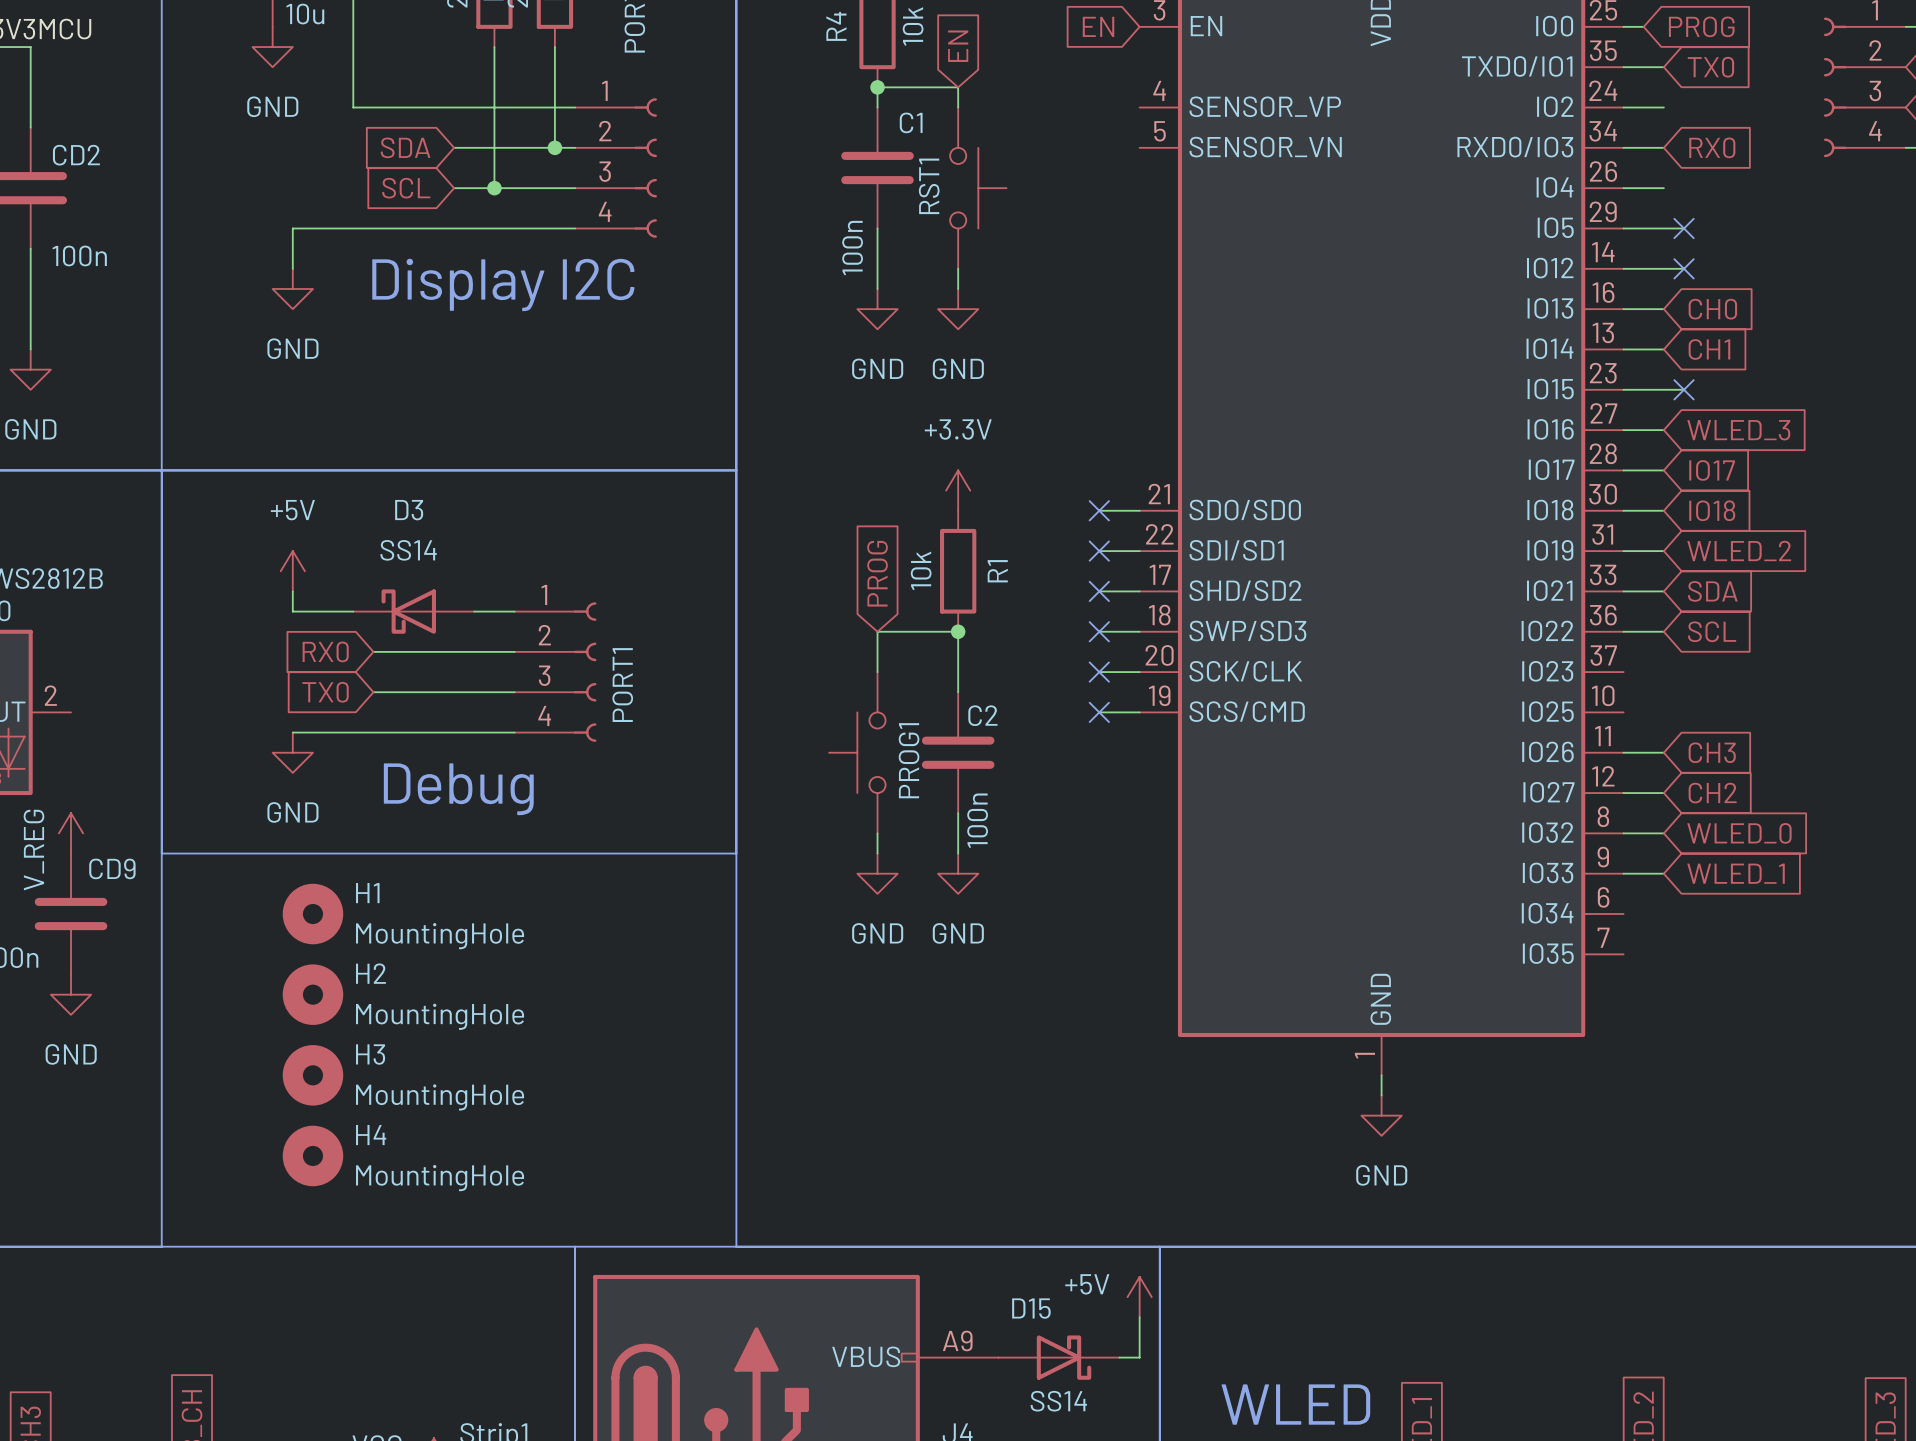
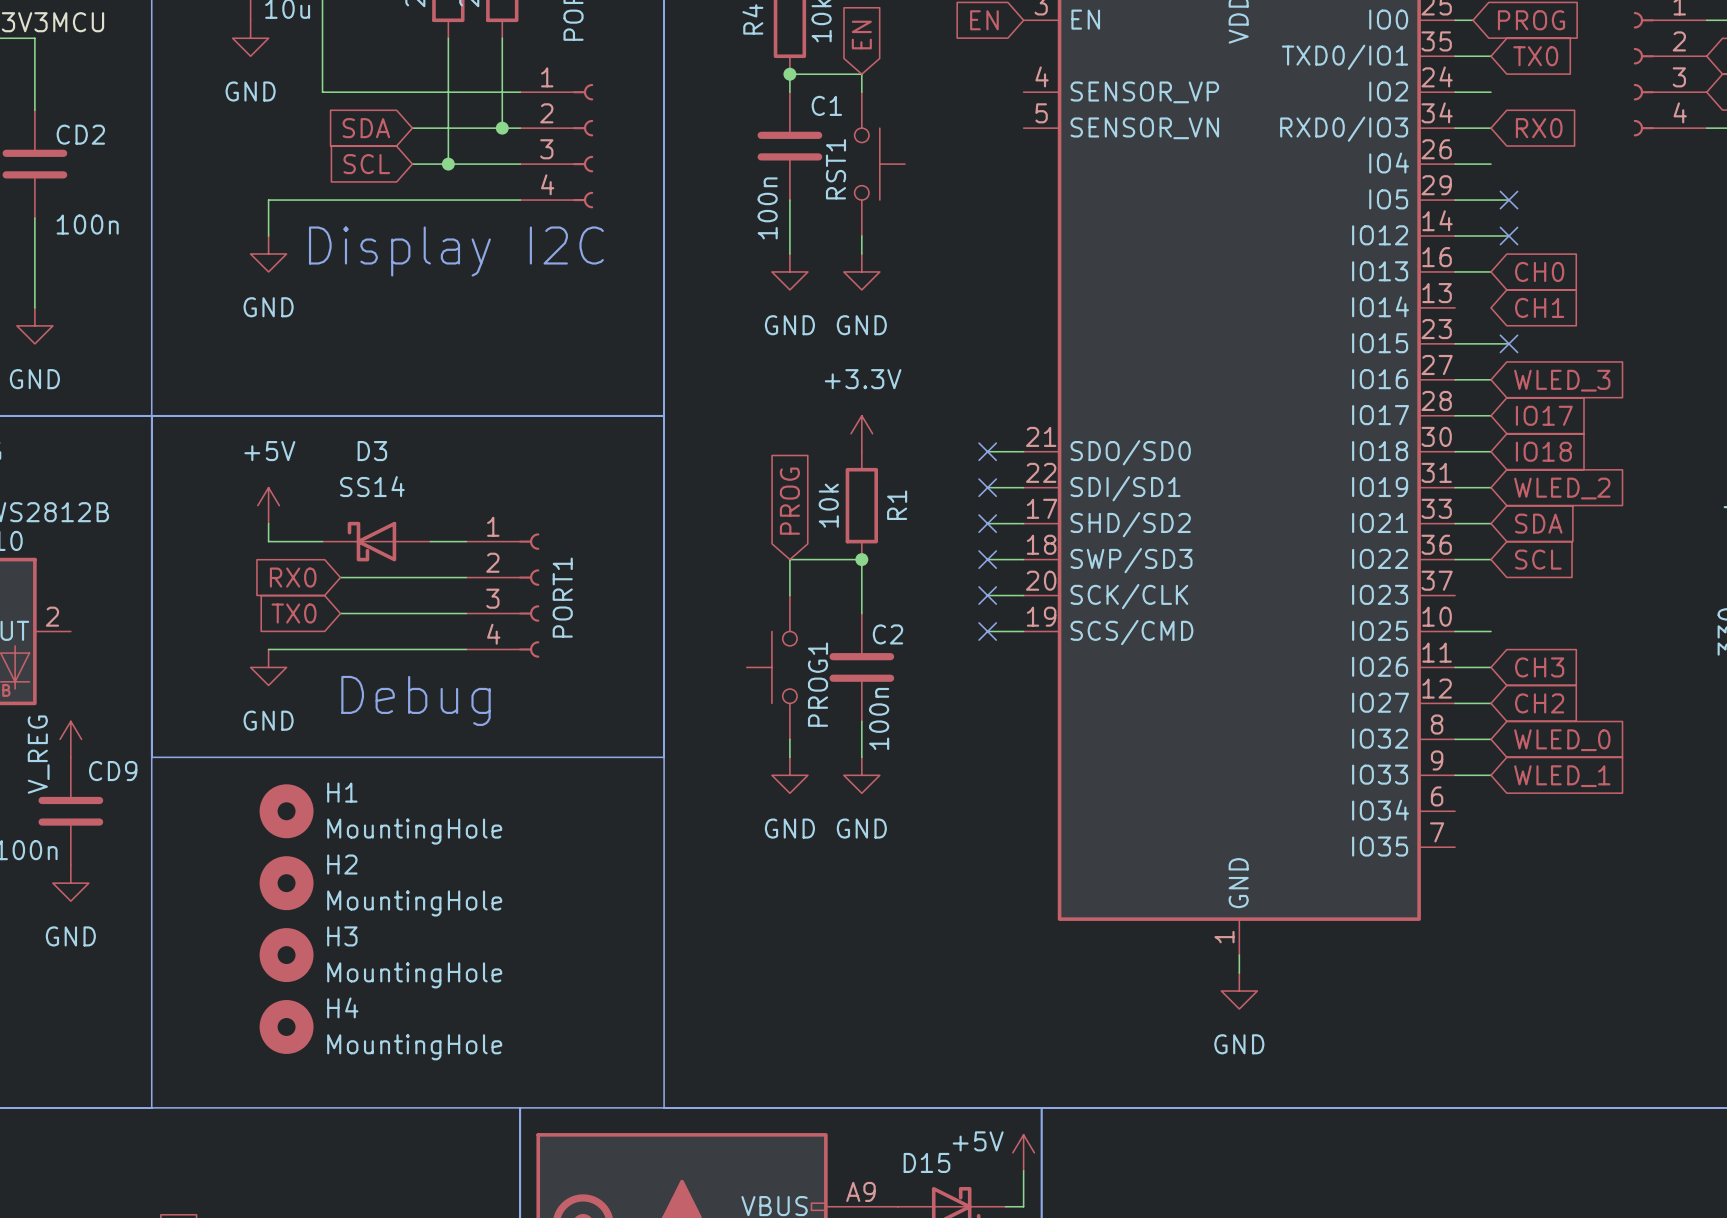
wire: (1623, 349) (1663, 349) -> (1455, 631) (1491, 631)

